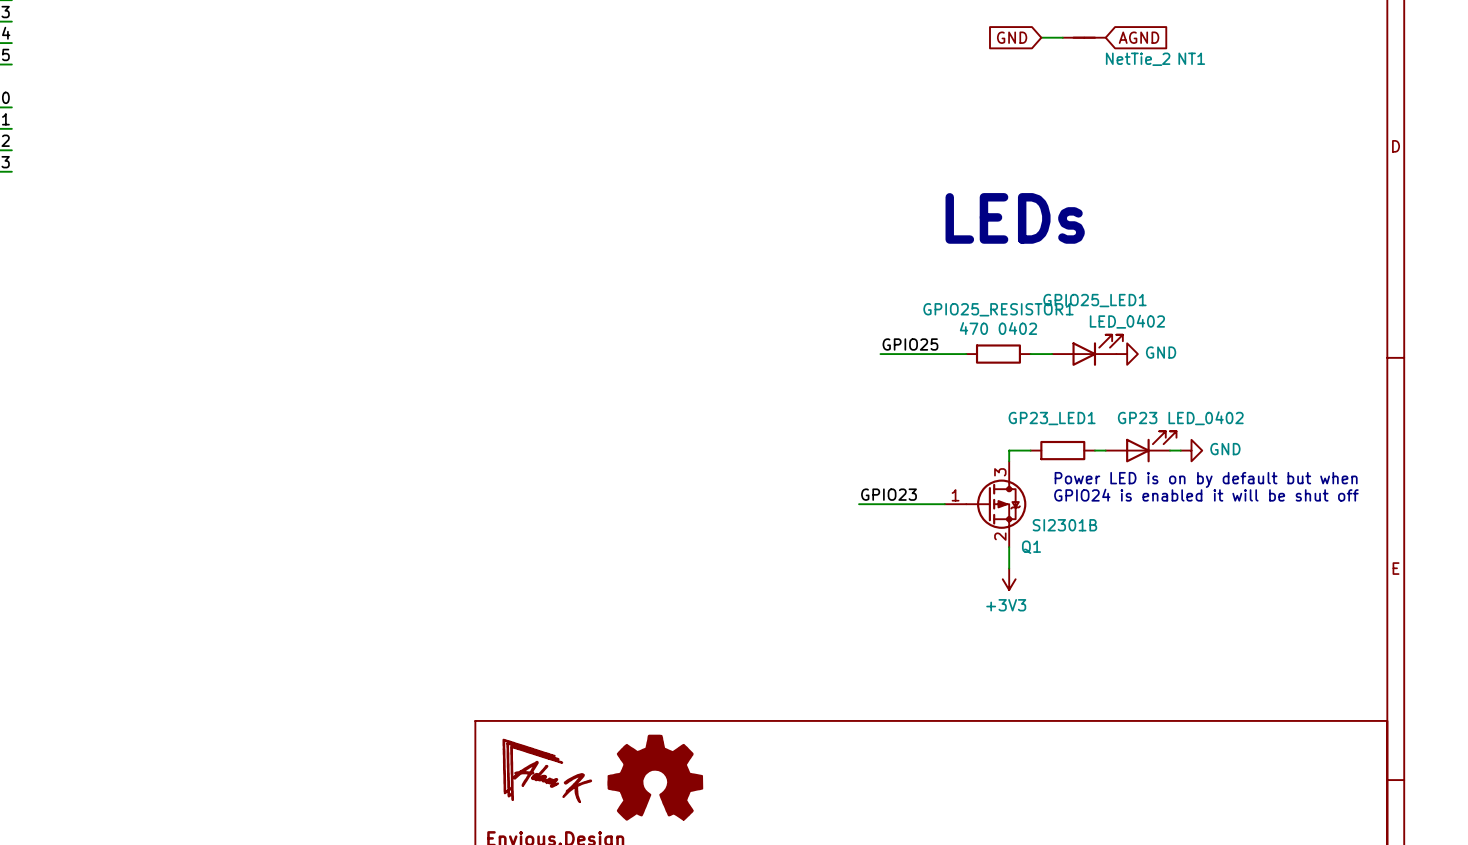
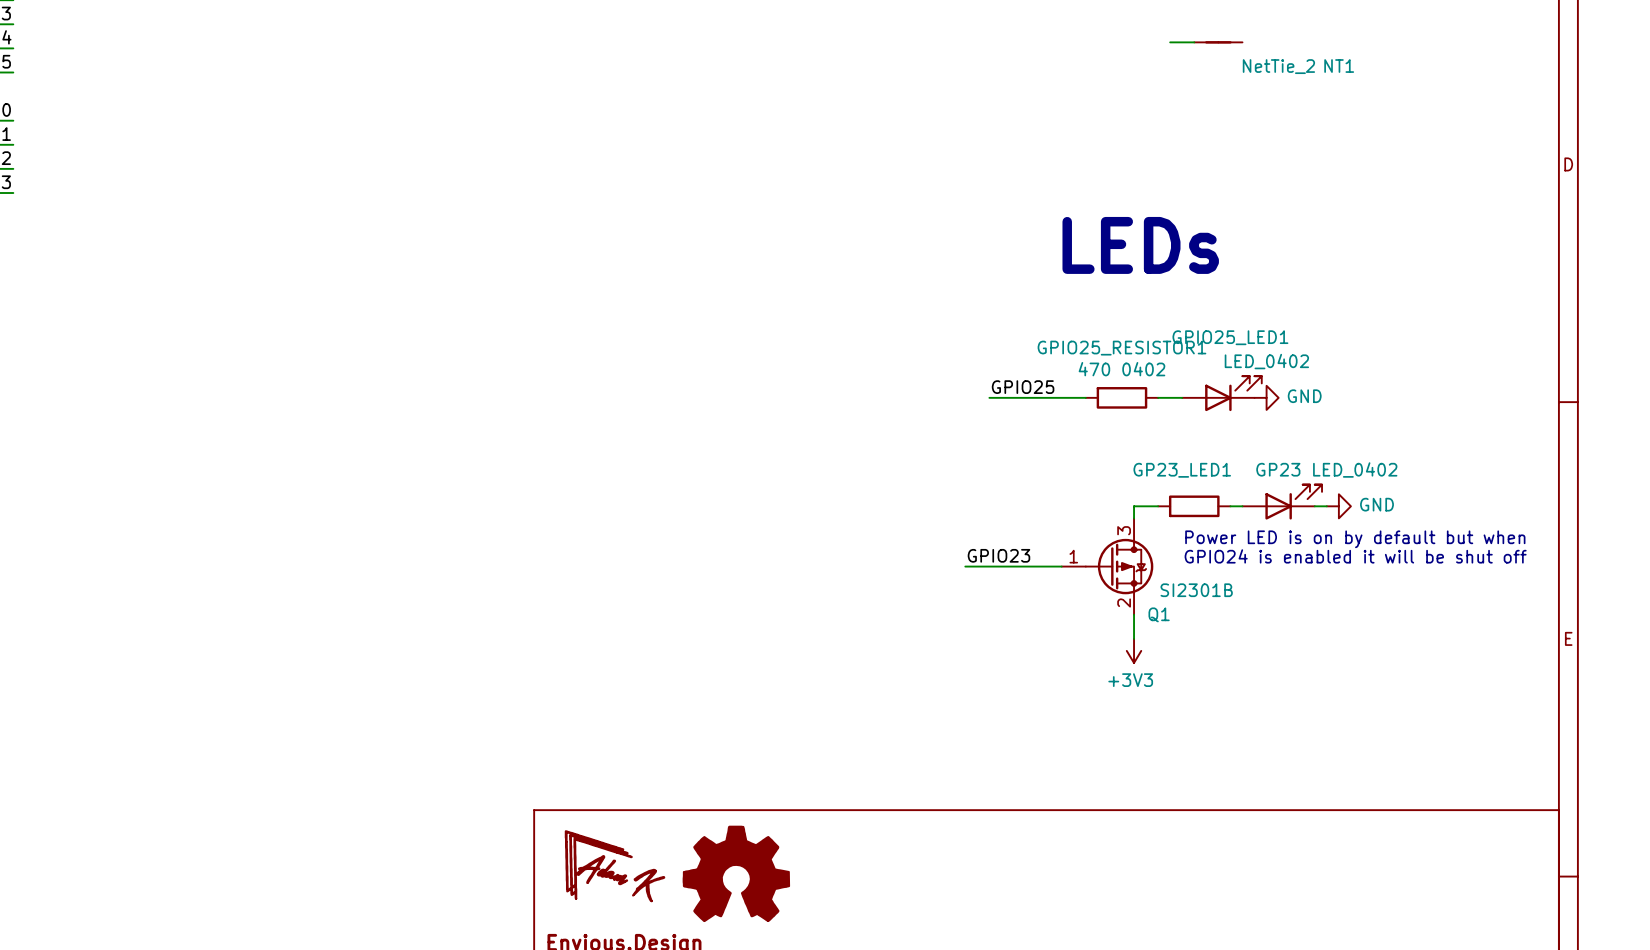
global label: GND (1012, 37) -> none
global label: AGND (1139, 37) -> none

